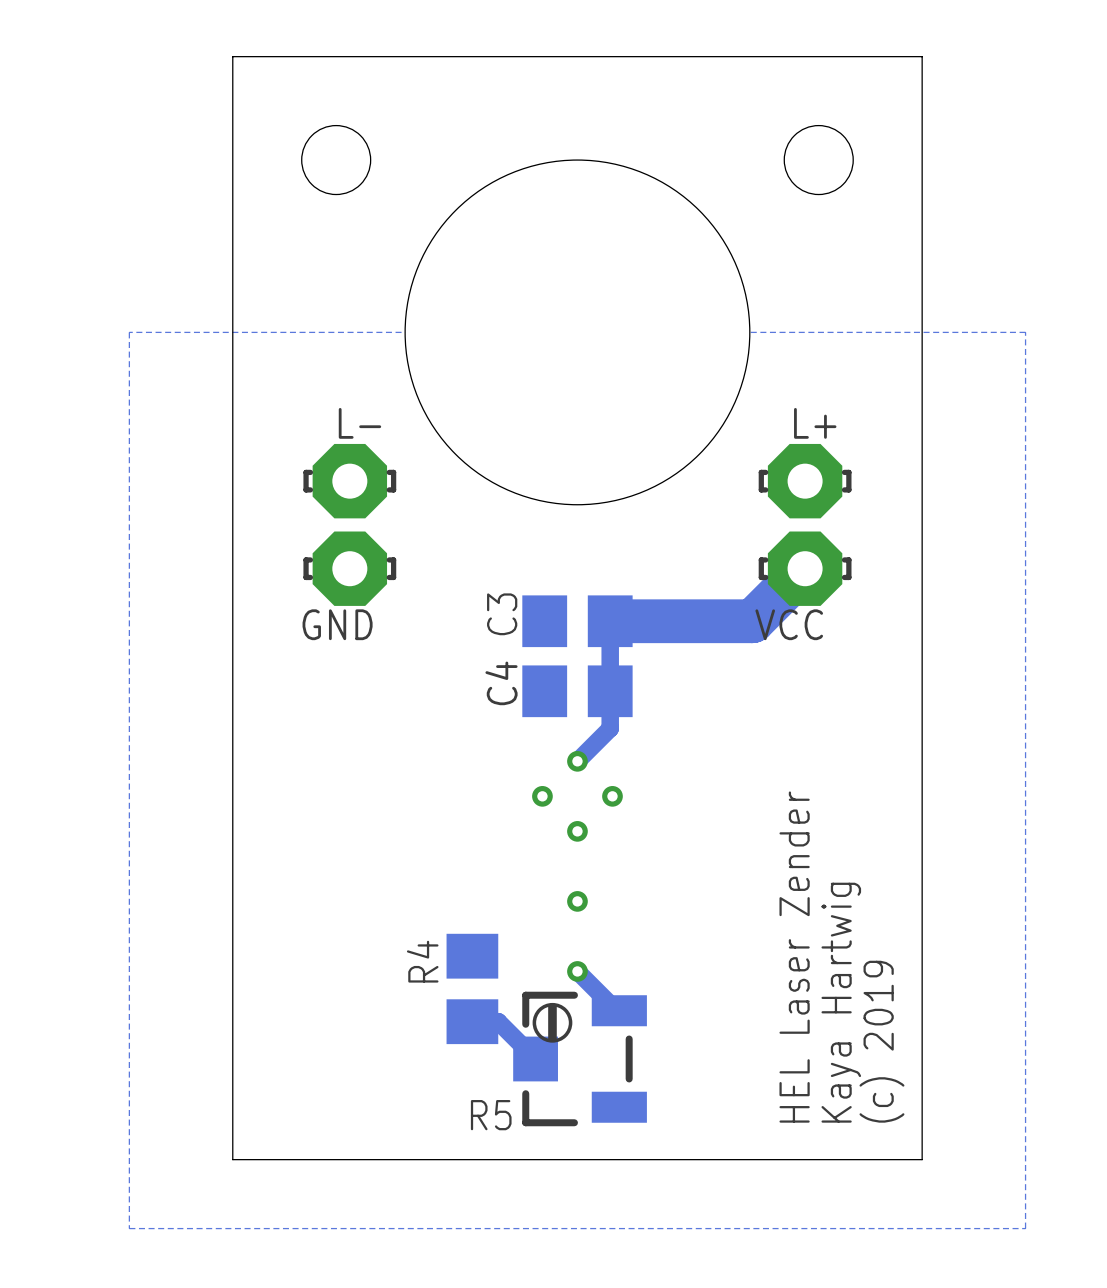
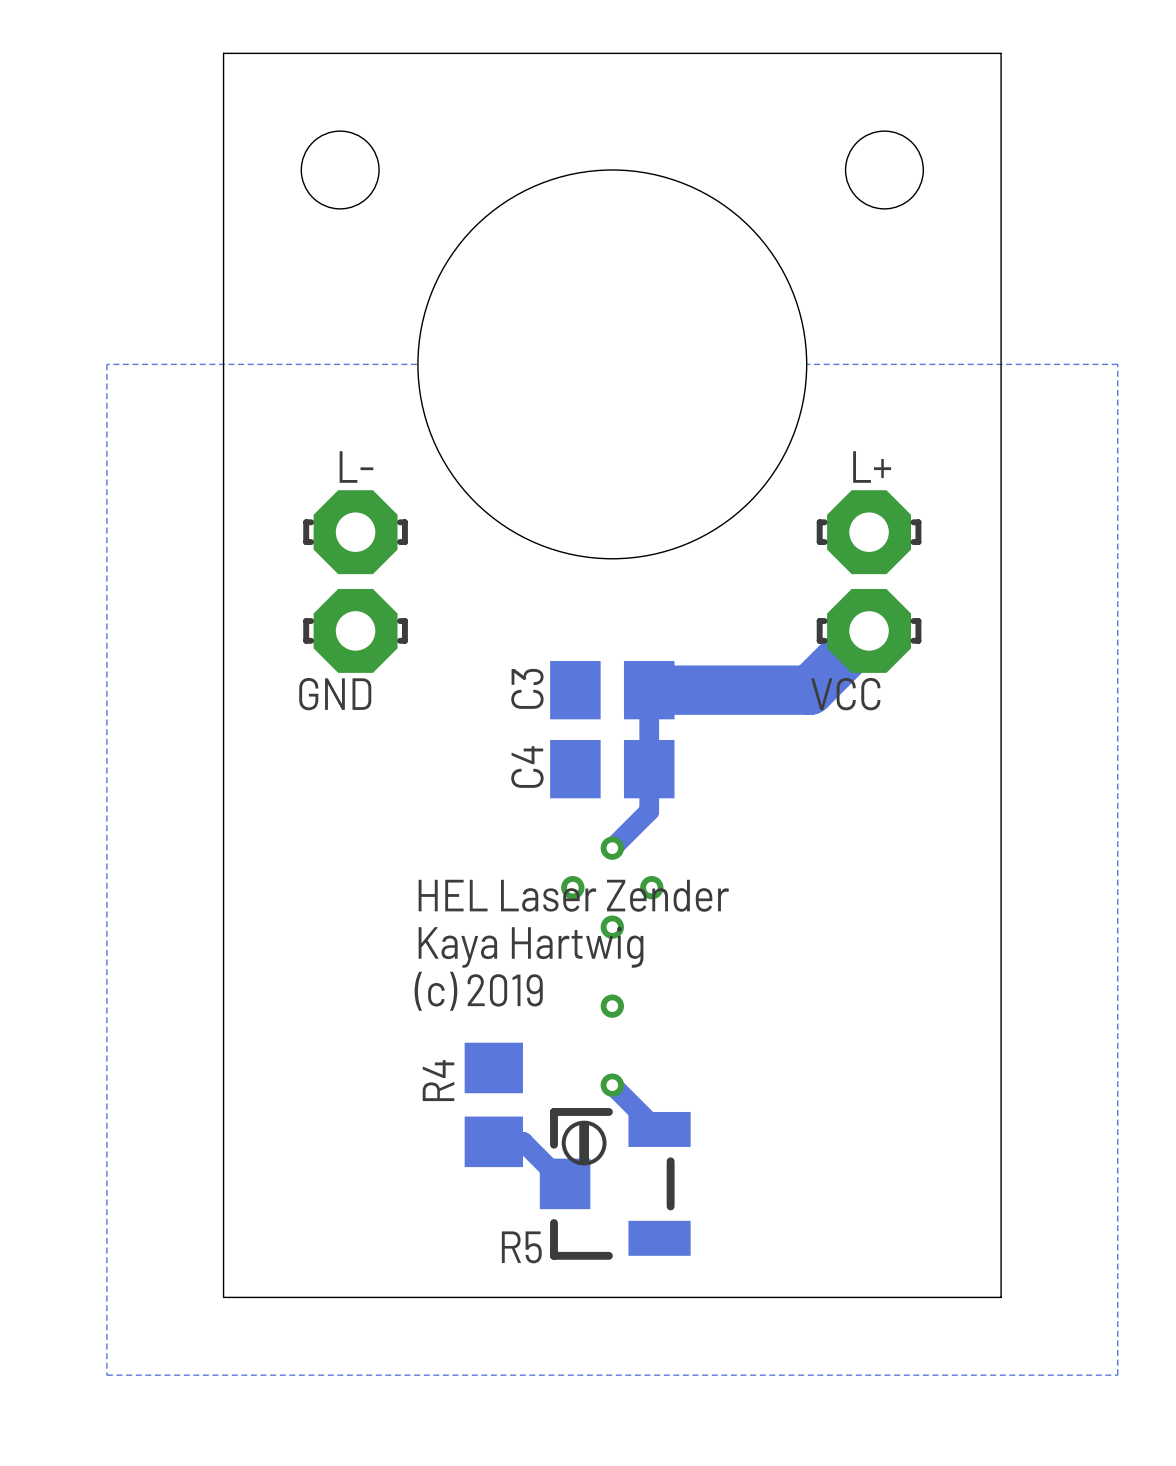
text rotation: 0° (794, 957) -> 90° clockwise (573, 895)
text rotation: 0° (841, 1002) -> 90° clockwise (531, 947)
text position: Kaya Hartwig (841, 1002) -> Kaya Hartwig (531, 947)
text rotation: 0° (881, 1041) -> 90° clockwise (478, 991)
text position: (c) 2019 (881, 1041) -> (c) 2019 (478, 991)

